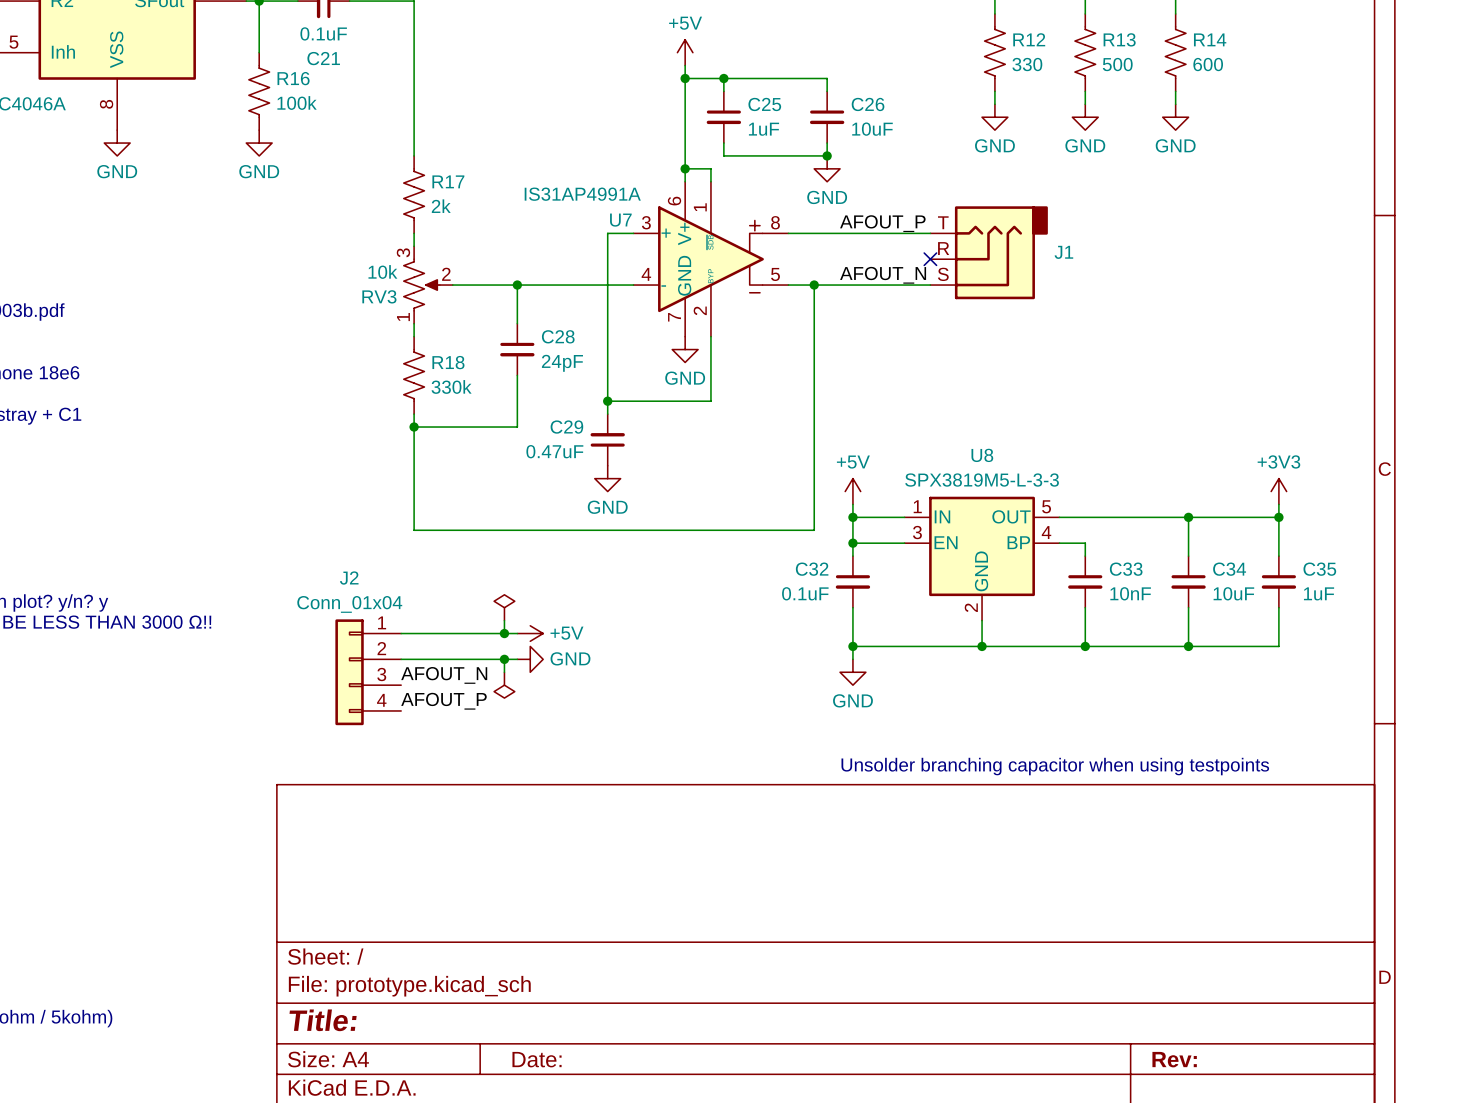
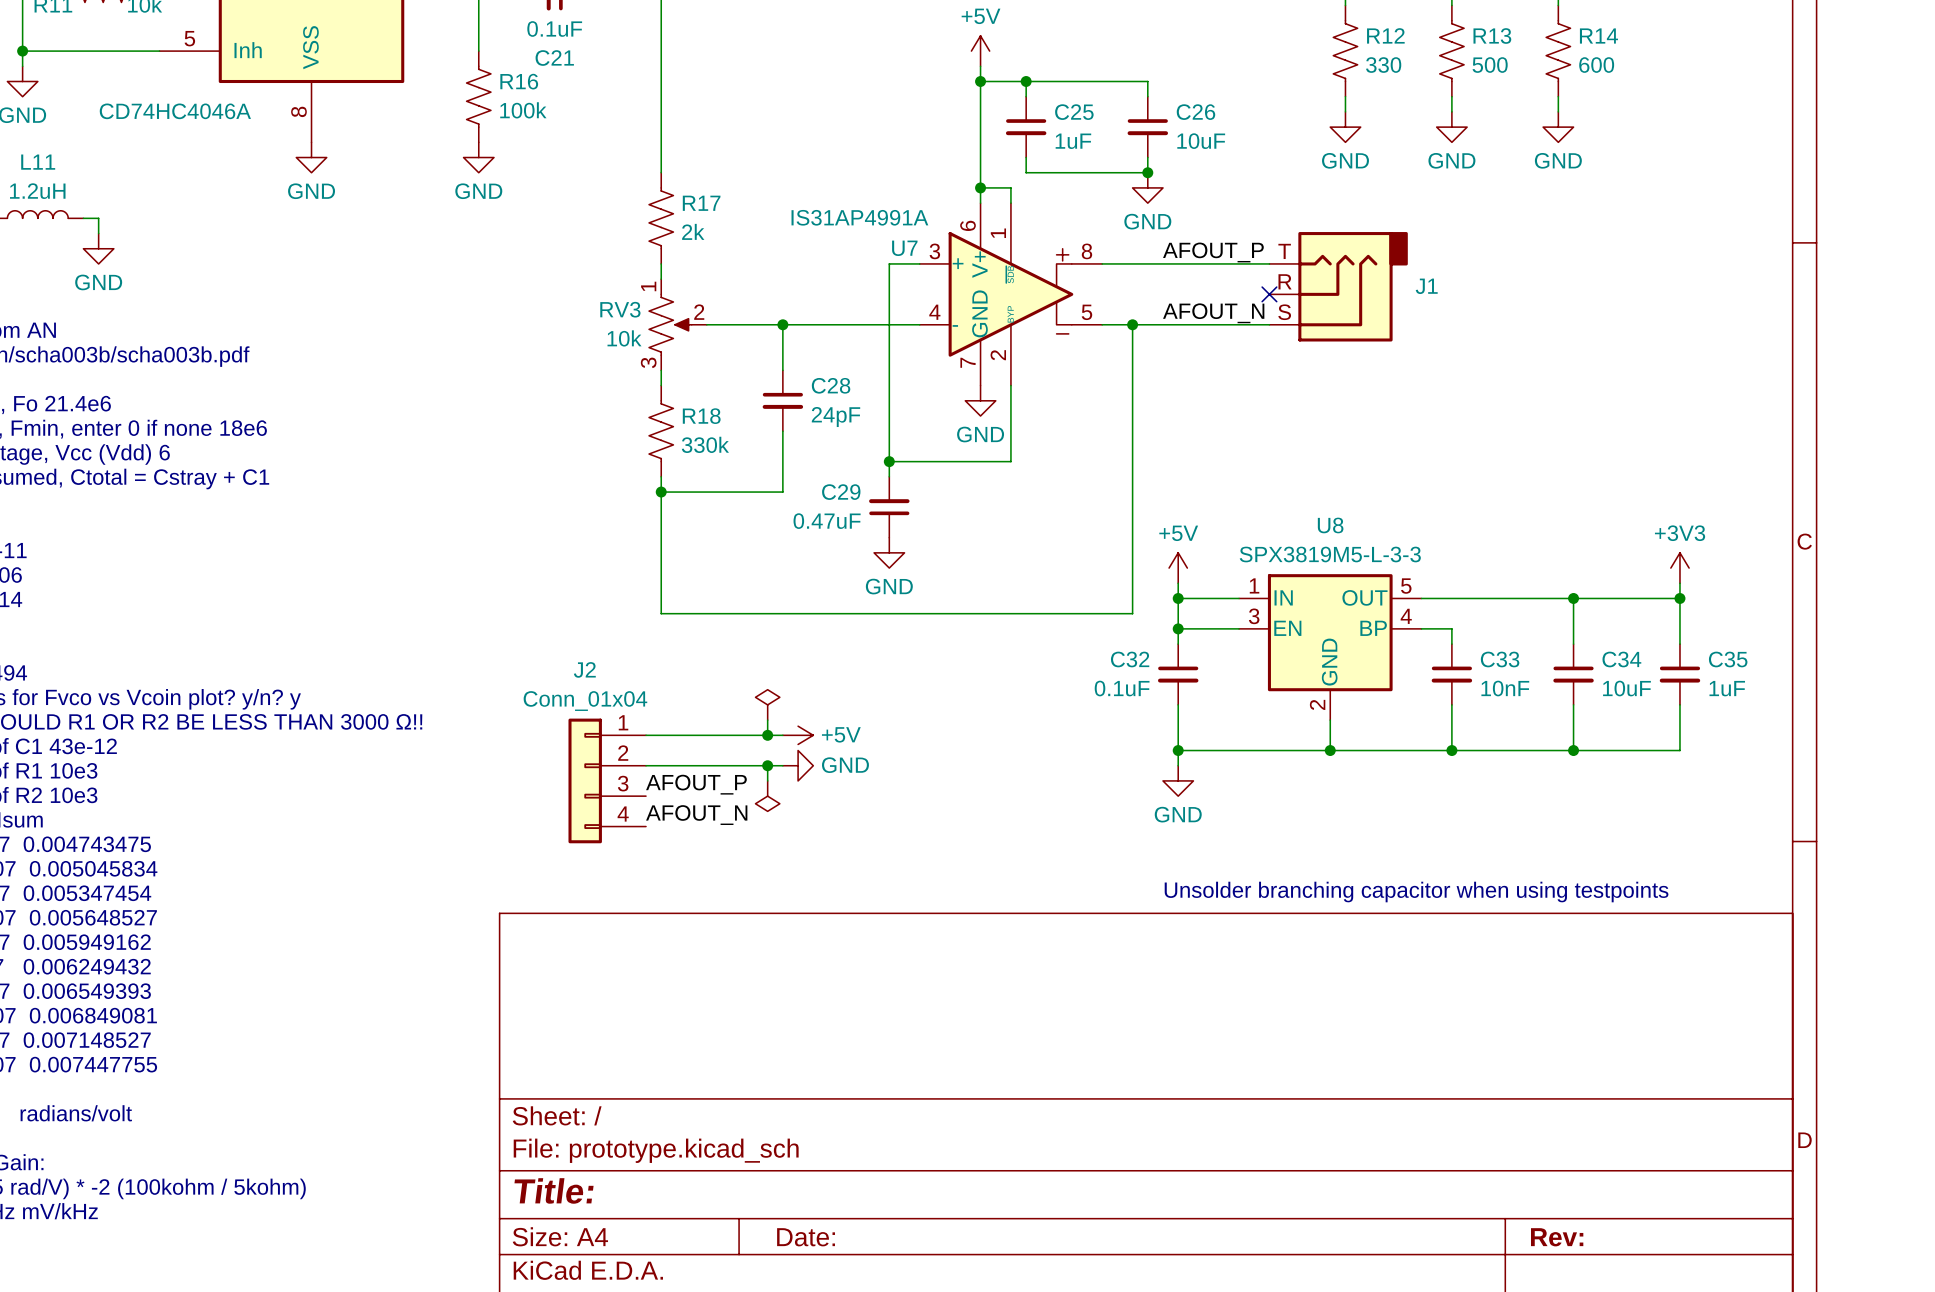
RV3 flip: as is (421, 285) -> up-down (670, 324)
label: AFOUT_N (444, 675) -> AFOUT_P (696, 784)
label: AFOUT_P (443, 701) -> AFOUT_N (696, 815)

